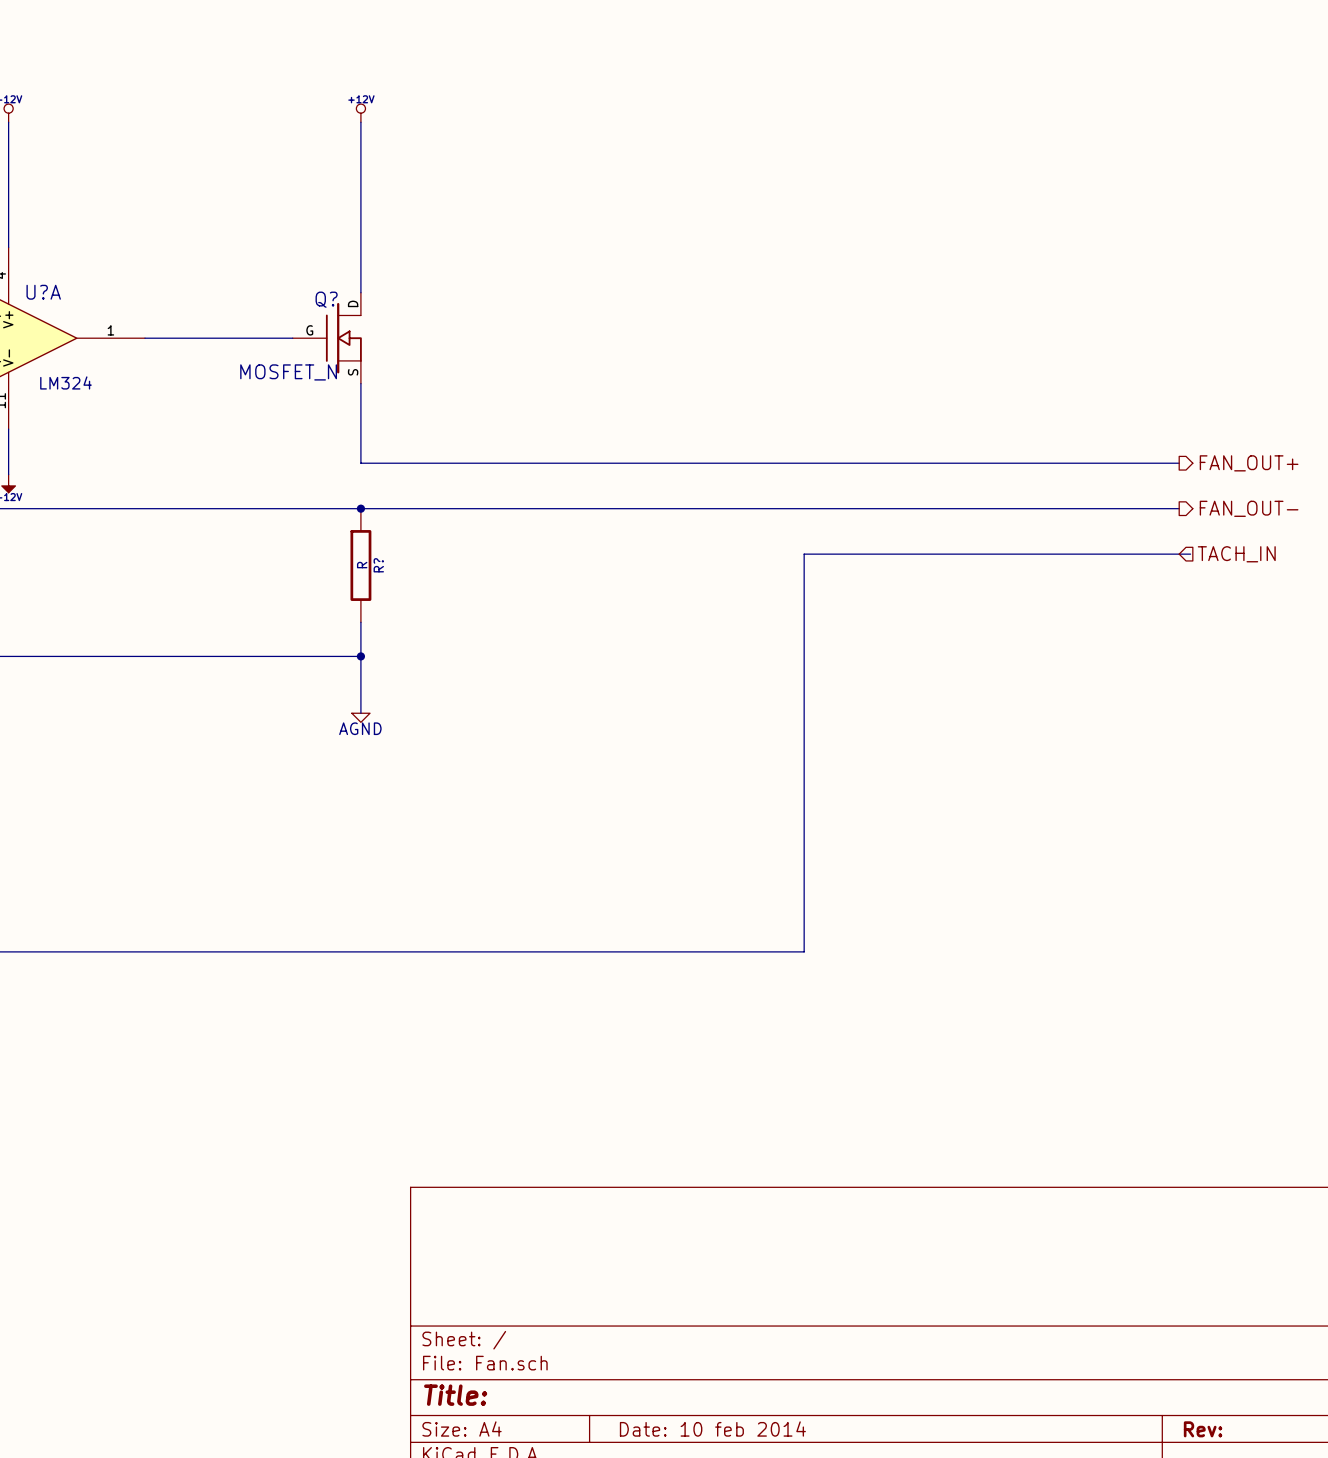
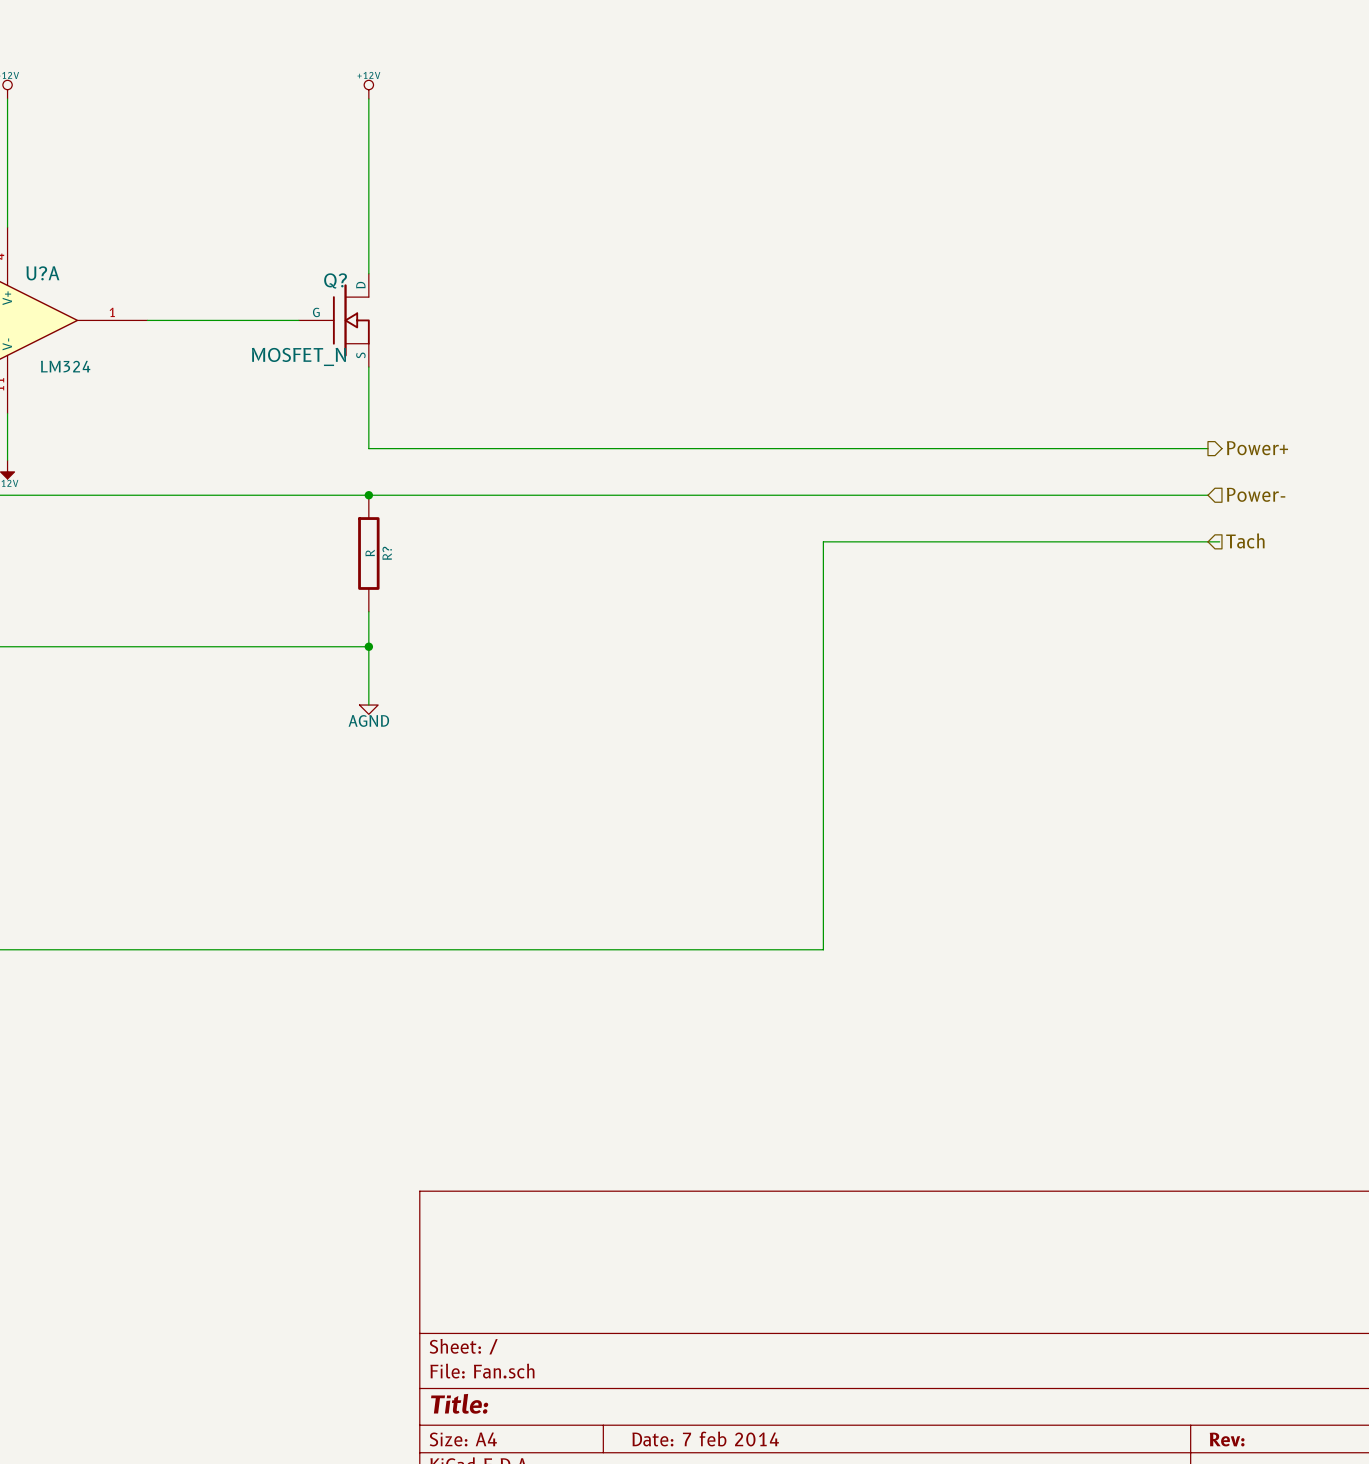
hierarchical label: FAN_OUT+ (1249, 463) -> Power+ (1257, 448)
hierarchical label shape: output (1249, 508) -> input (1256, 494)
hierarchical label: FAN_OUT- (1249, 508) -> Power- (1256, 494)
hierarchical label: TACH_IN (1236, 554) -> Tach (1245, 540)
title block: Date: 10 feb 2014 (712, 1429) -> Date: 7 feb 2014 (705, 1439)

